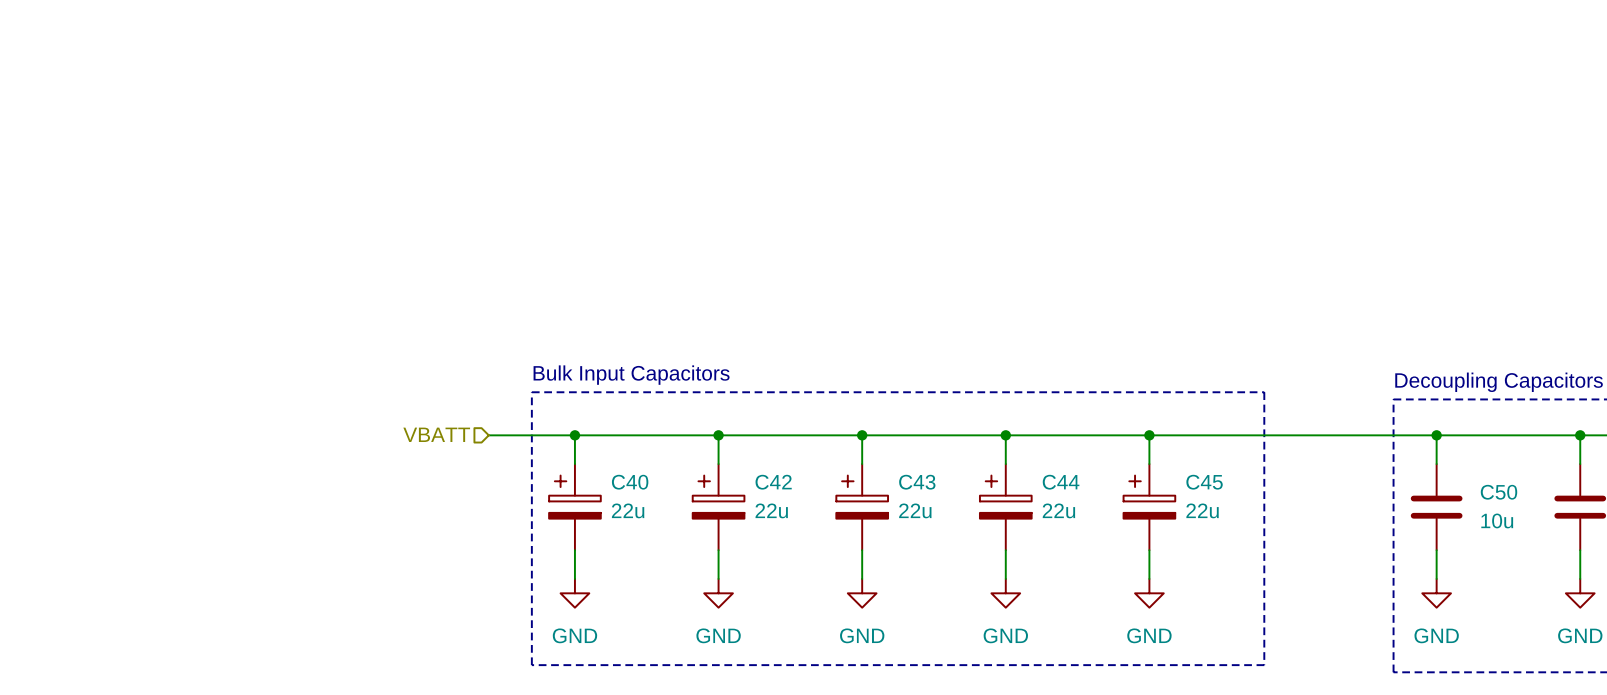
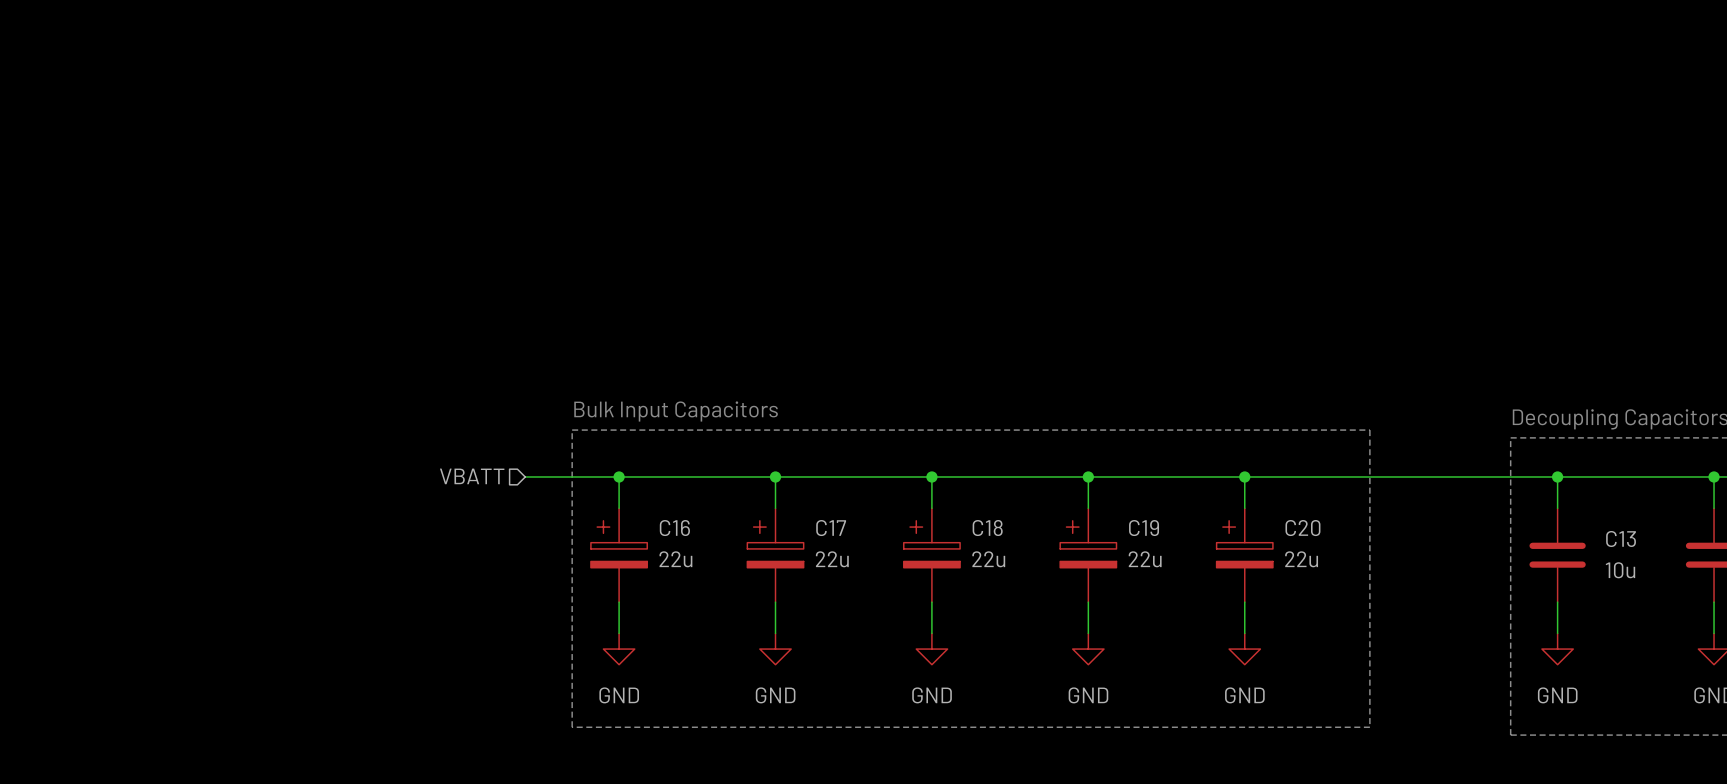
C40 name: C40 (630, 482) -> C16 (674, 528)
C42 name: C42 (773, 482) -> C17 (831, 528)
C43 name: C43 (917, 482) -> C18 (987, 528)
C44 name: C44 (1061, 482) -> C19 (1144, 528)
C45 name: C45 (1204, 482) -> C20 (1302, 528)
C50 name: C50 (1498, 492) -> C13 (1621, 538)

